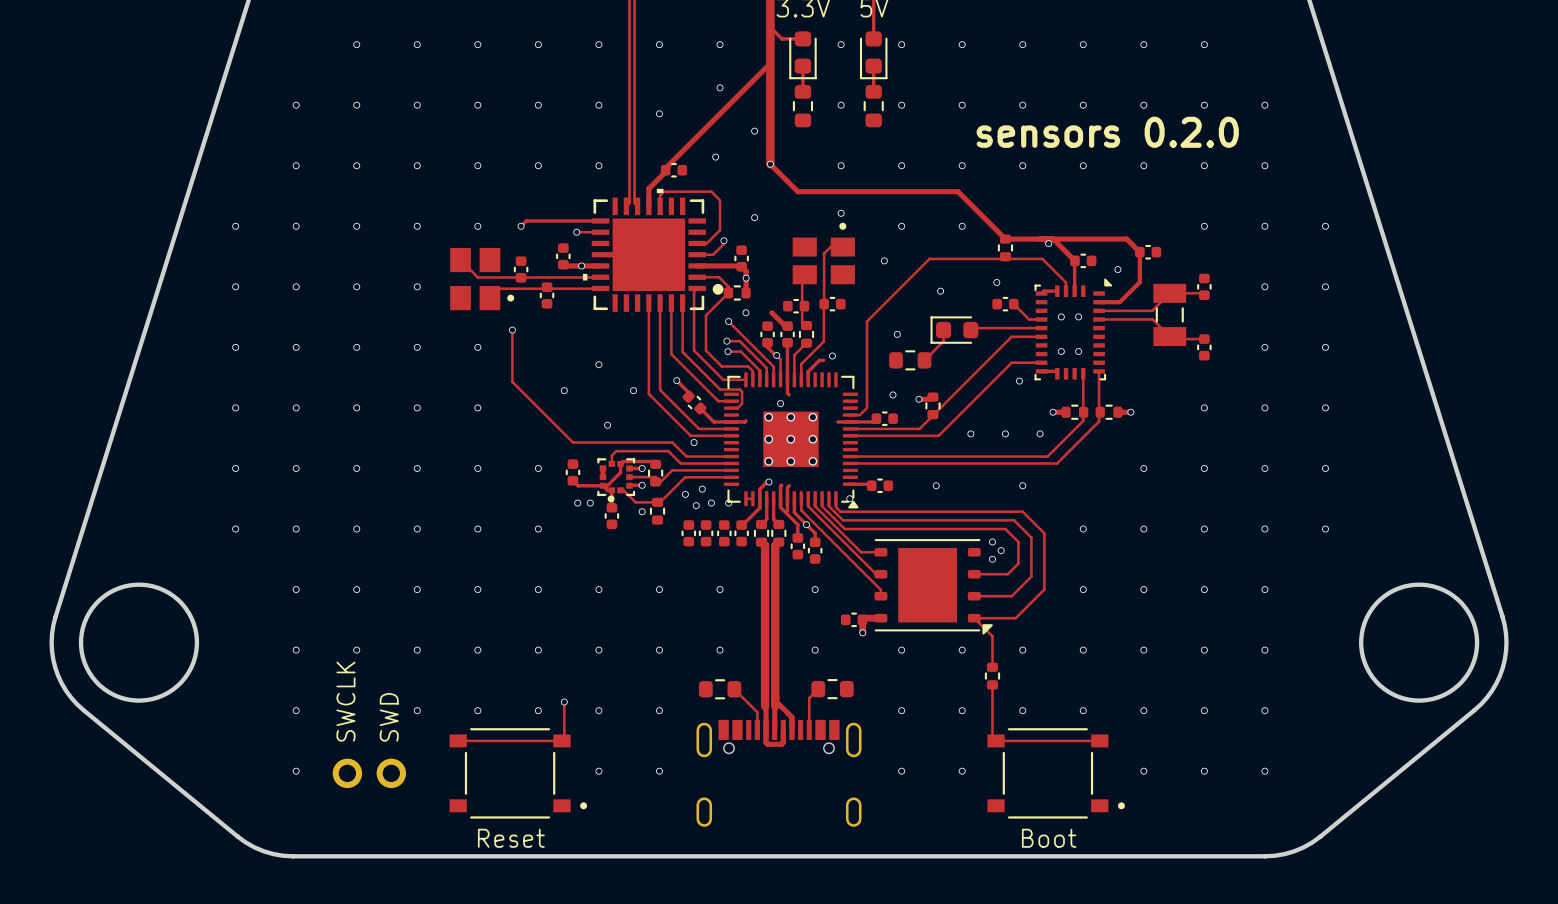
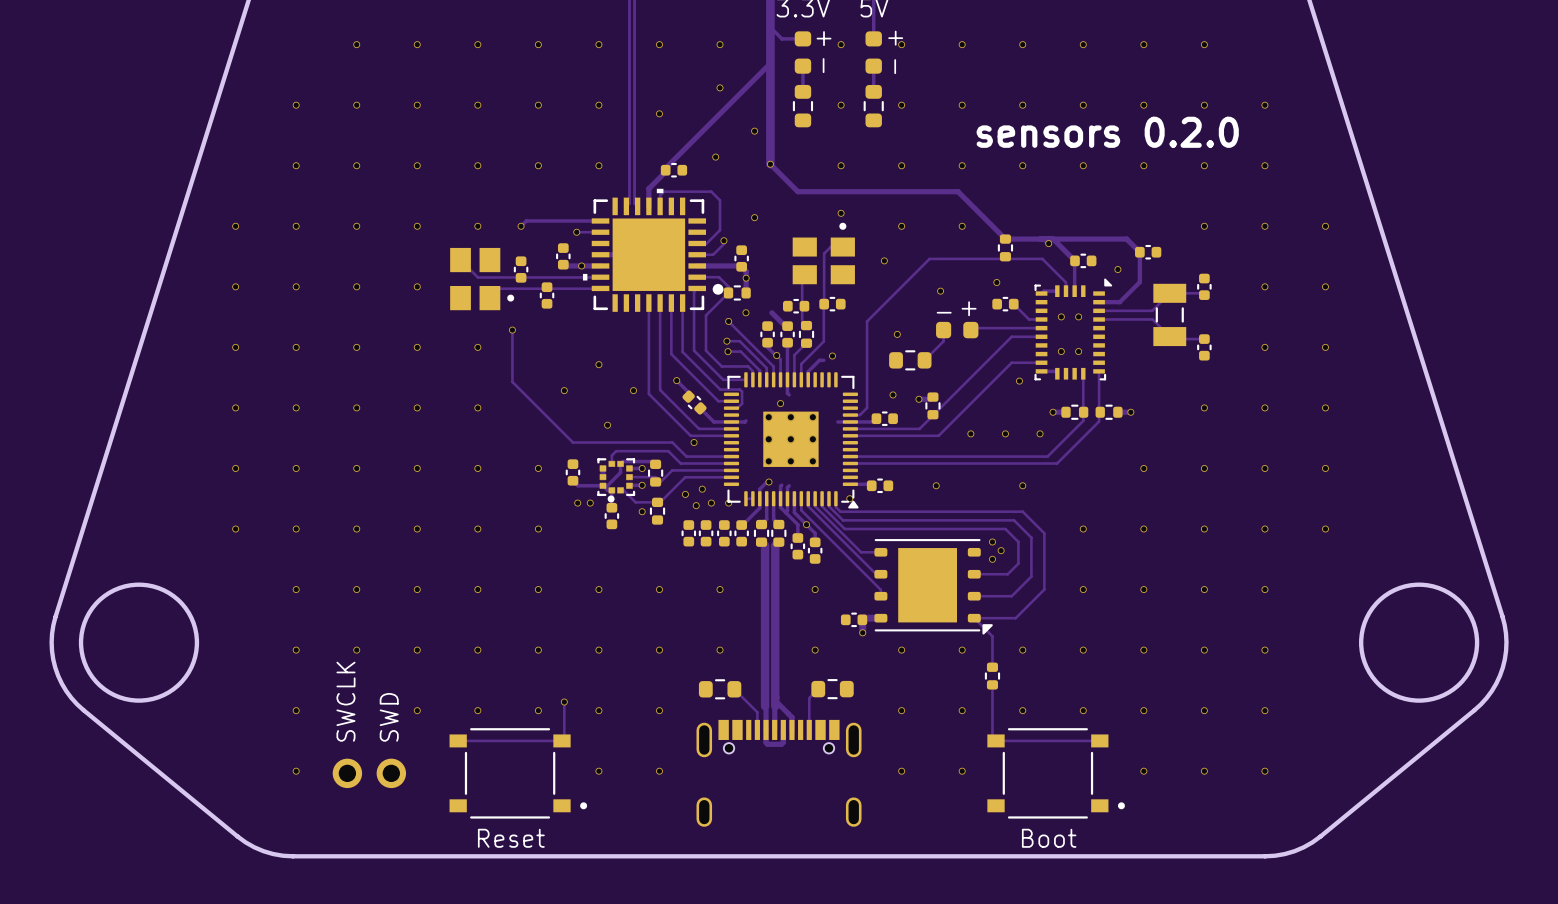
part footprint: [789, 31, 817, 80] -> [794, 31, 812, 74]
part footprint: [859, 31, 888, 80] -> [865, 31, 882, 74]
part footprint: [930, 316, 979, 344] -> [936, 321, 979, 339]

